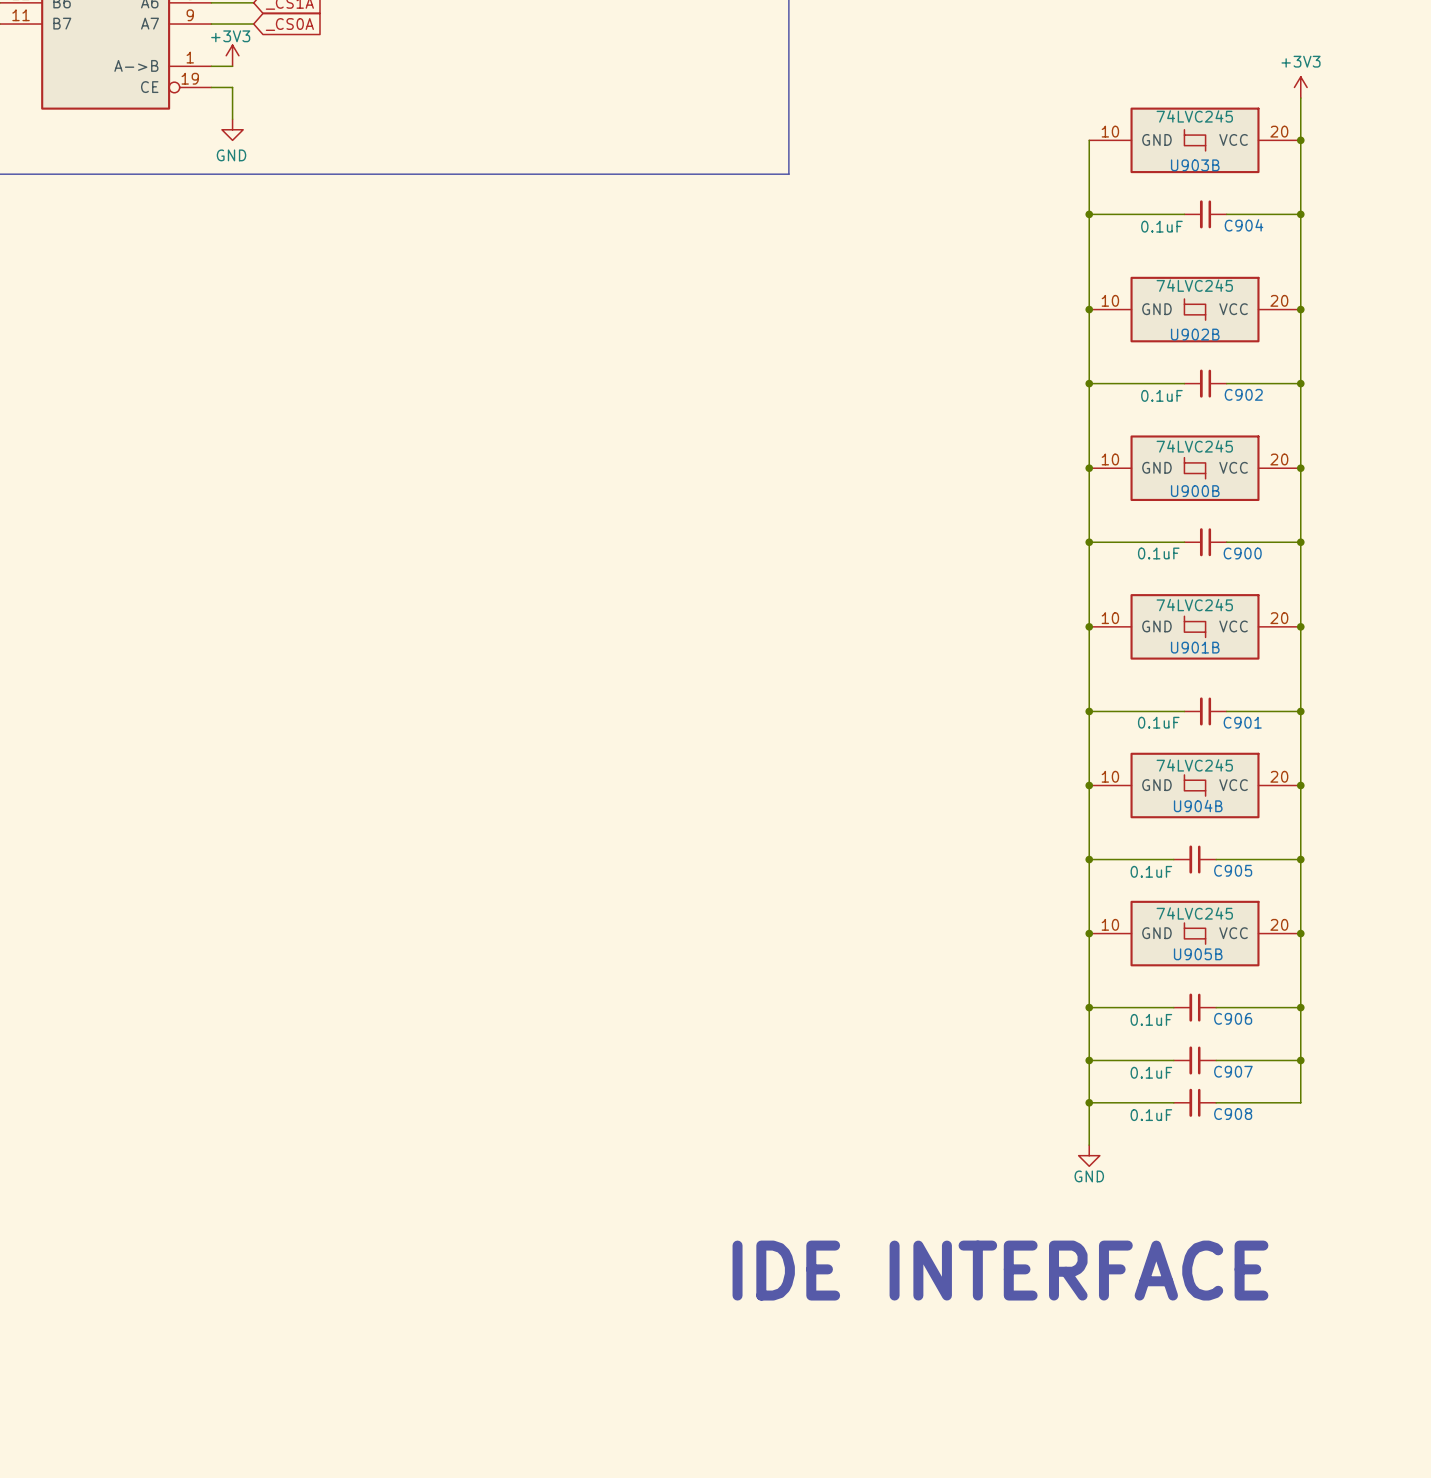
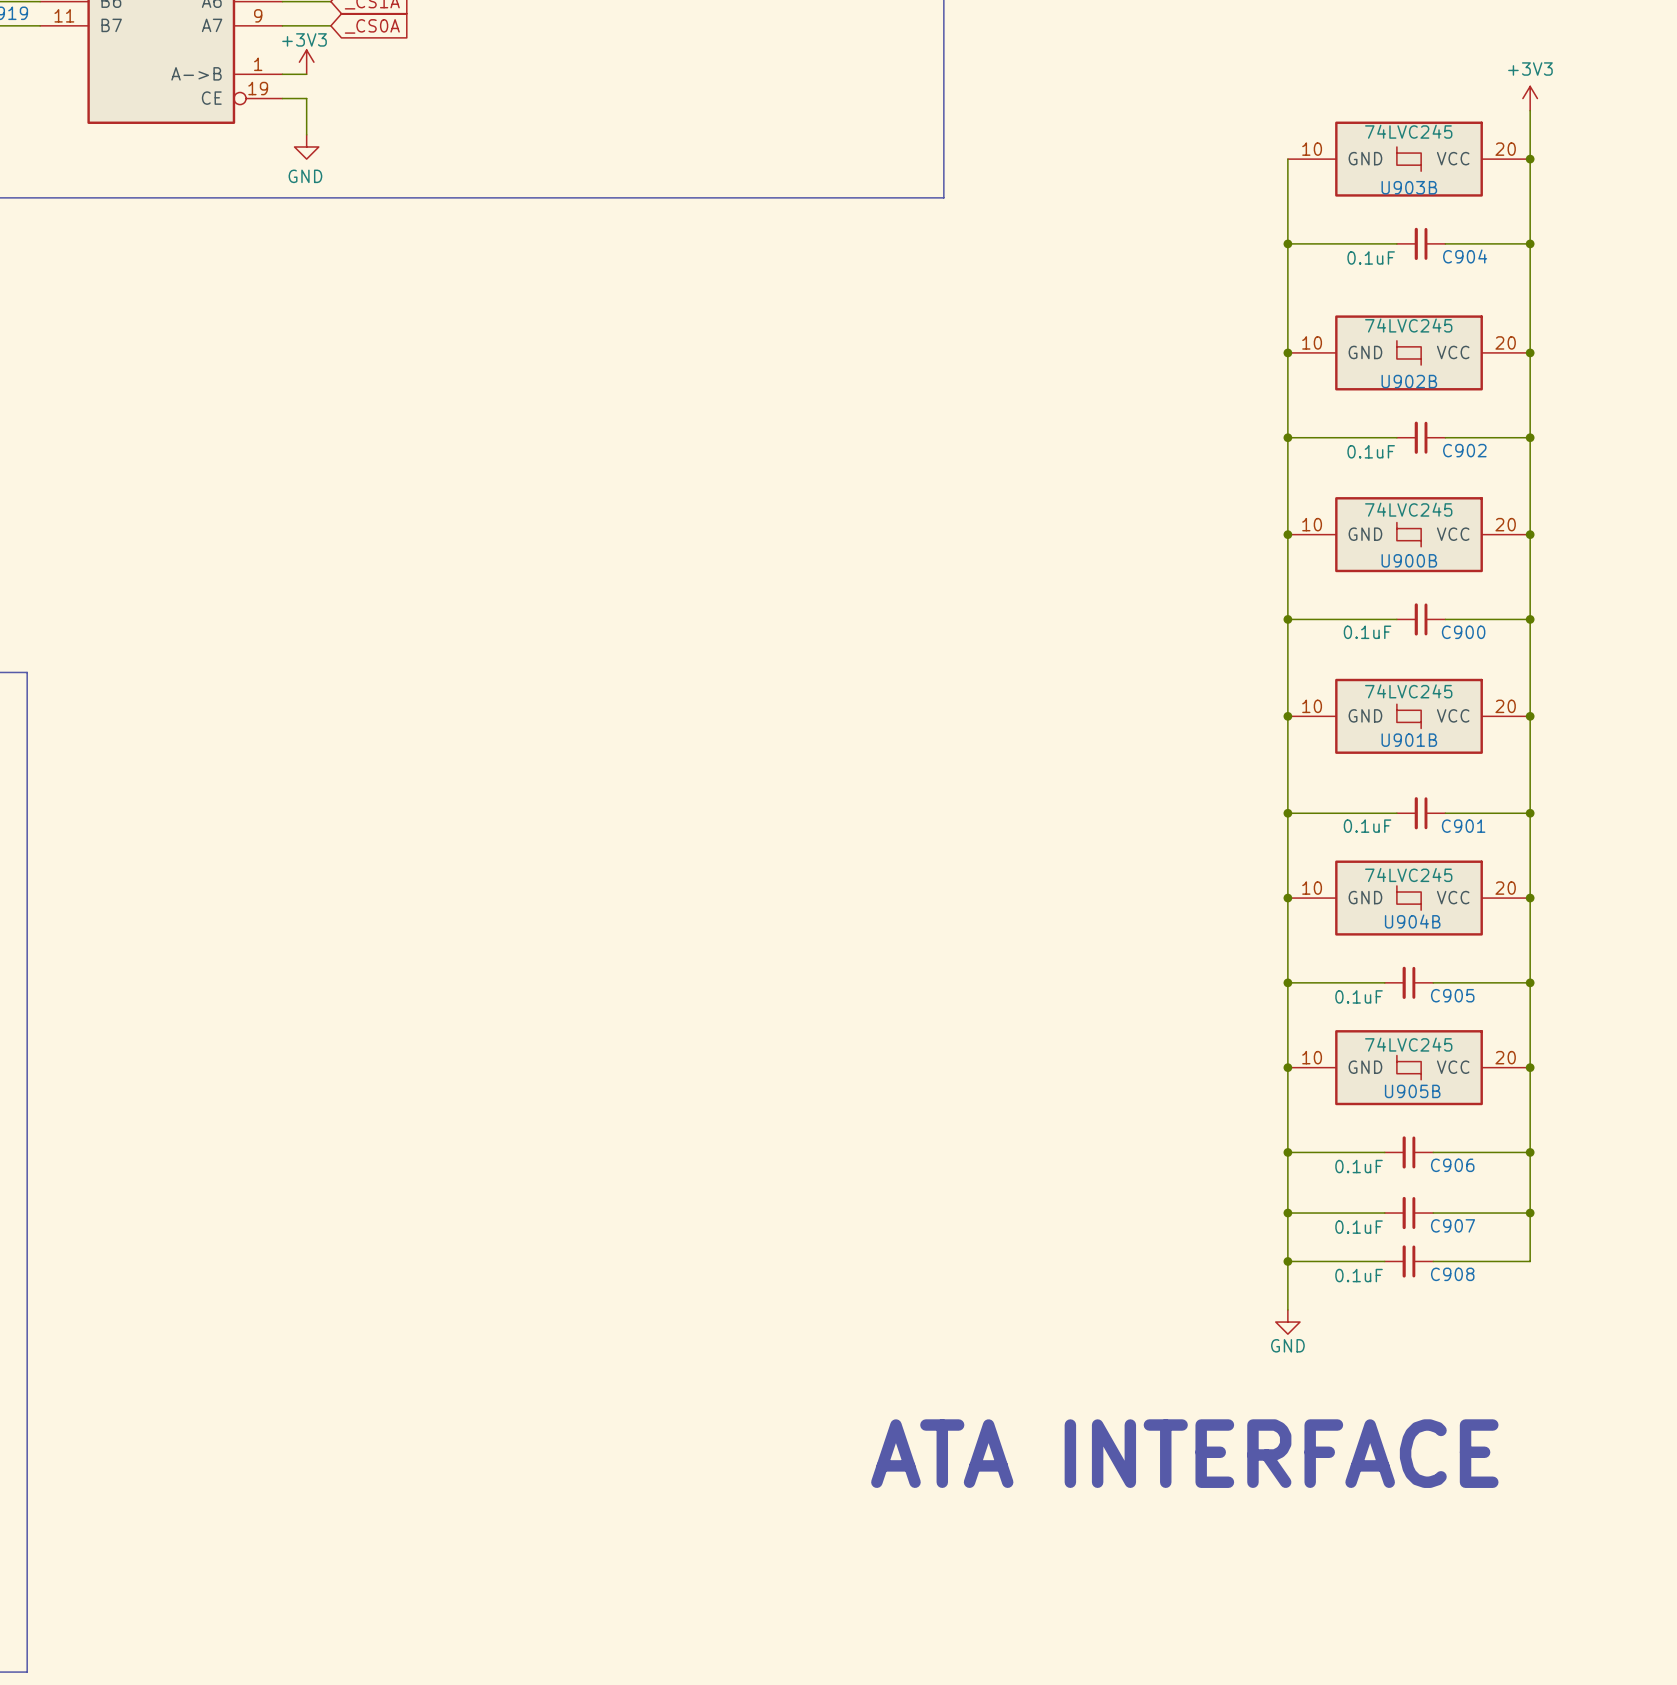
text: IDE INTERFACE (1000, 1270) -> ATA INTERFACE (1184, 1453)

